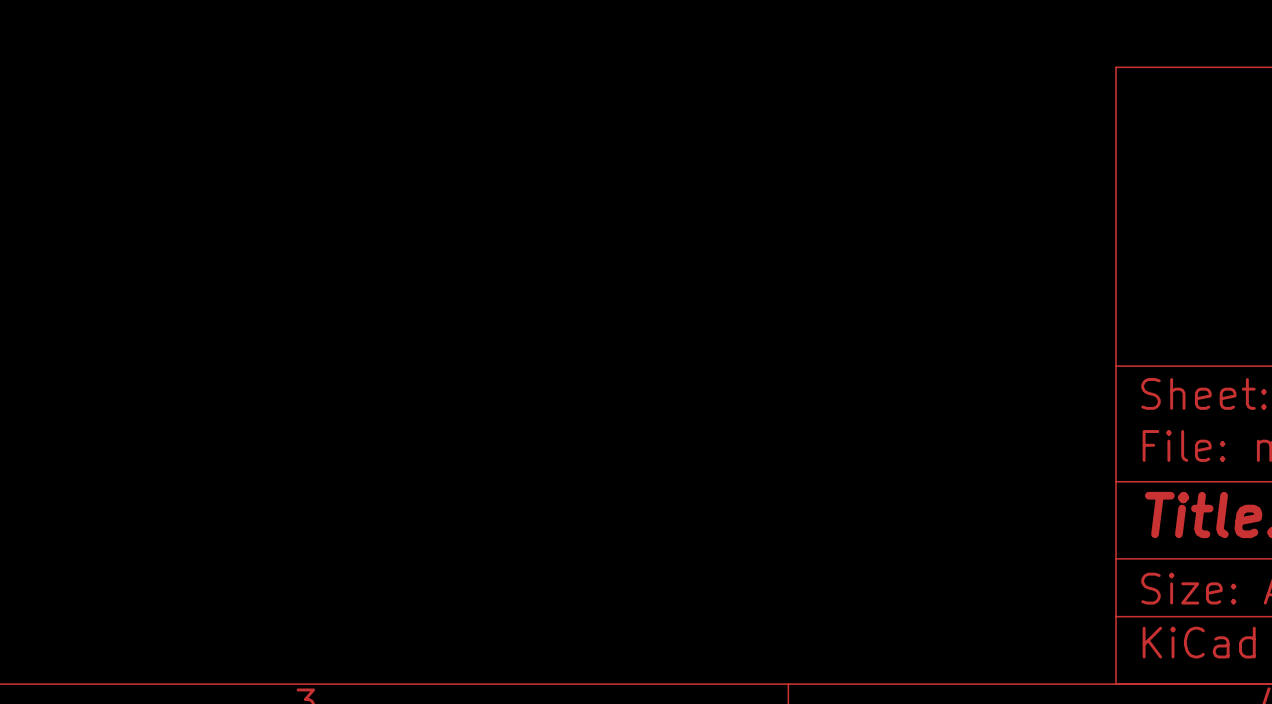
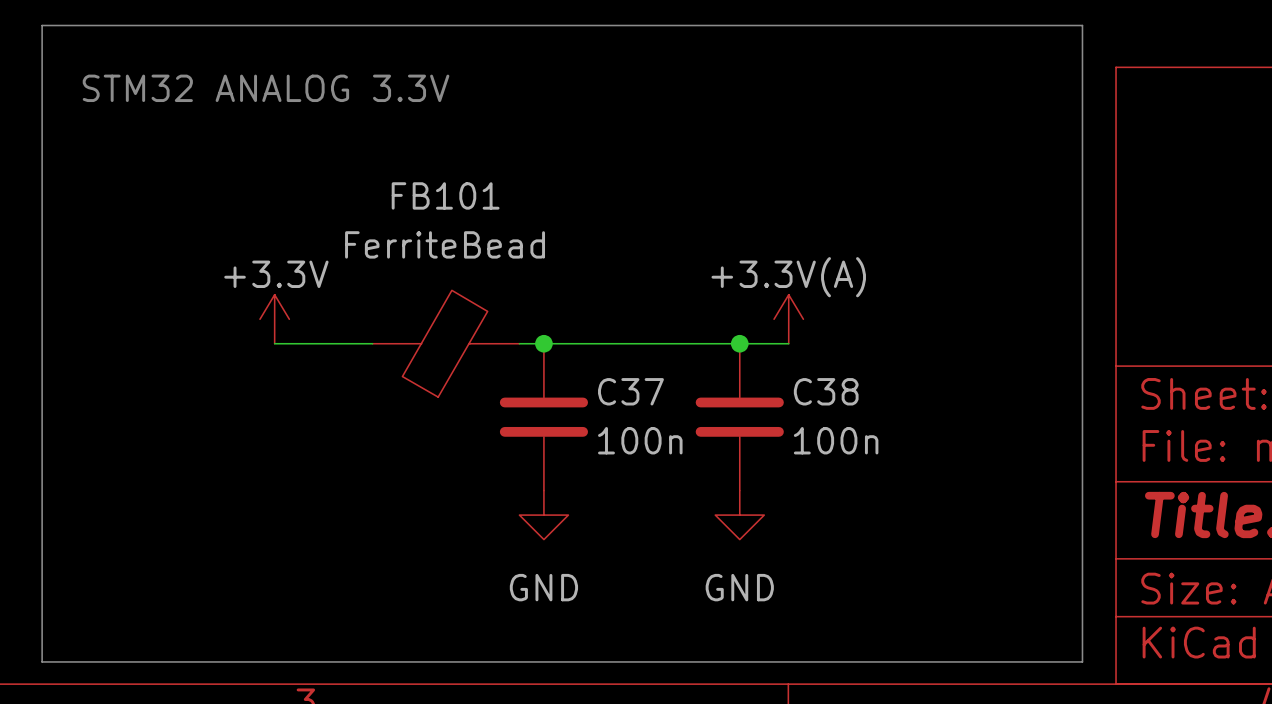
line: none -> (42, 25) (1082, 25) (1082, 661) (42, 661) (42, 25)
text: none -> STM32 ANALOG 3.3V (266, 88)
power symbol: none -> +3.3V (274, 319)
power symbol: none -> +3.3V(A) (788, 319)
wire: none -> (274, 343) (372, 343)
FB101: none -> FerriteBead (446, 343)
wire: none -> (519, 343) (788, 343)
junction: none -> (543, 343)
junction: none -> (739, 343)
C37: none -> 100n (543, 417)
C38: none -> 100n (739, 417)
power symbol: none -> GND (543, 515)
power symbol: none -> GND (739, 515)

